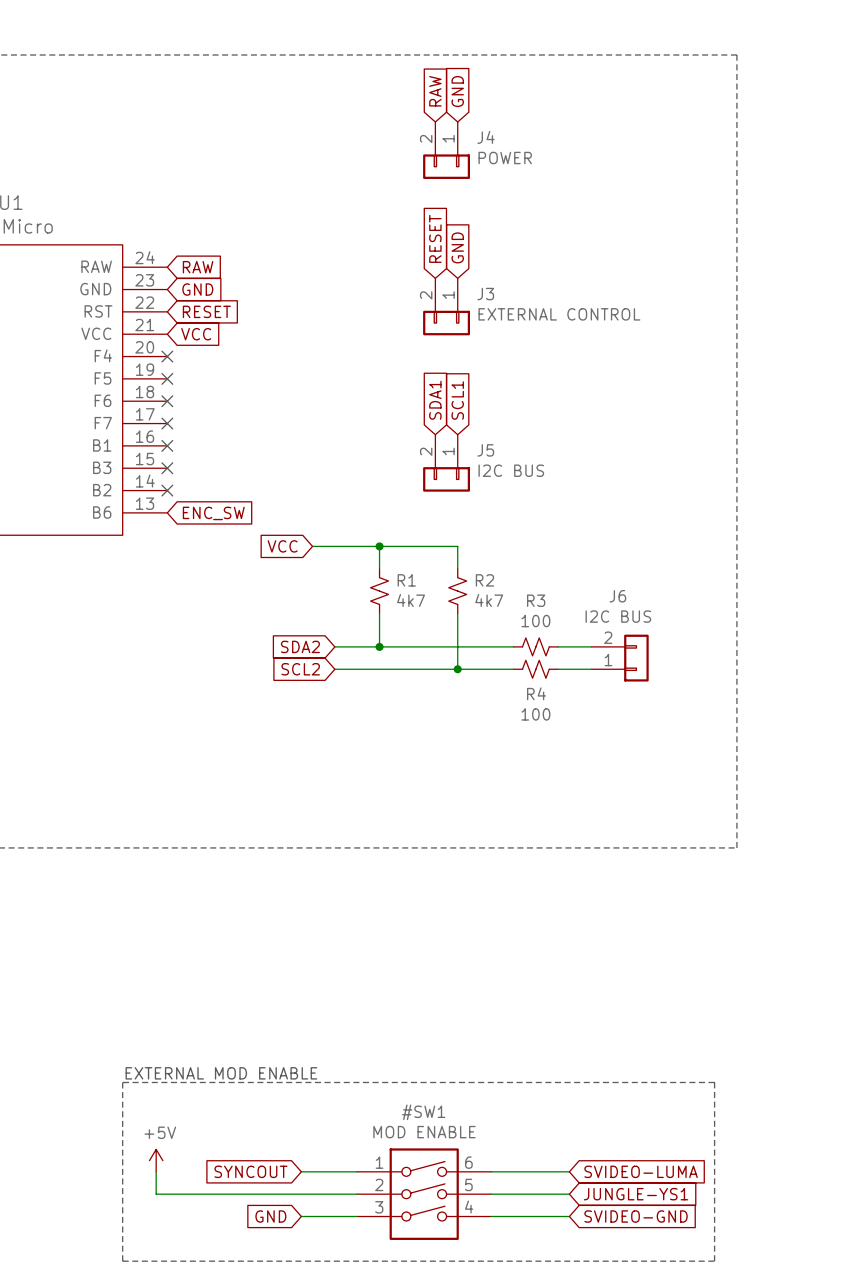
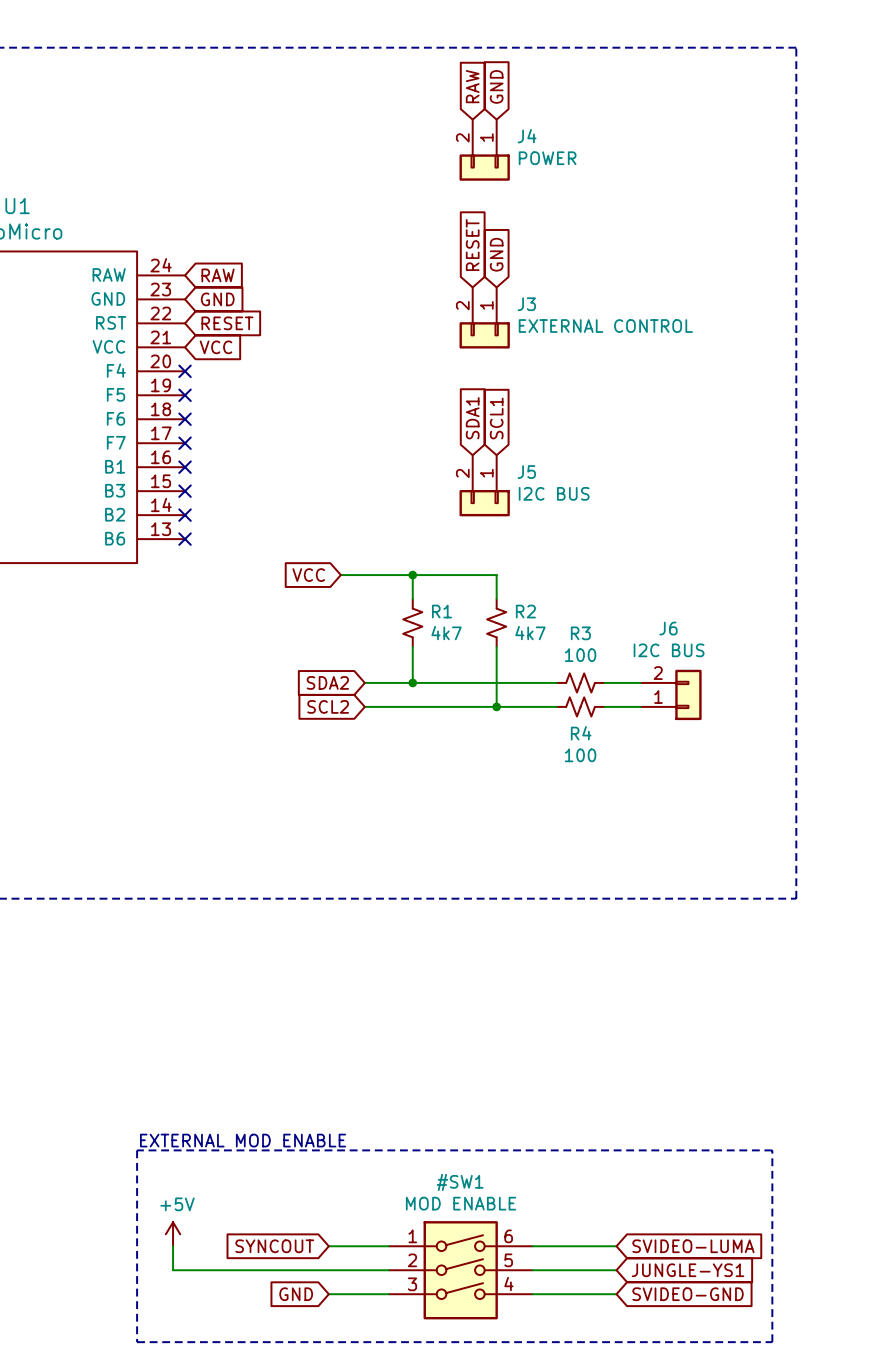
no-connect mark: none -> (185, 539)
global label: ENC_SW (213, 513) -> none

